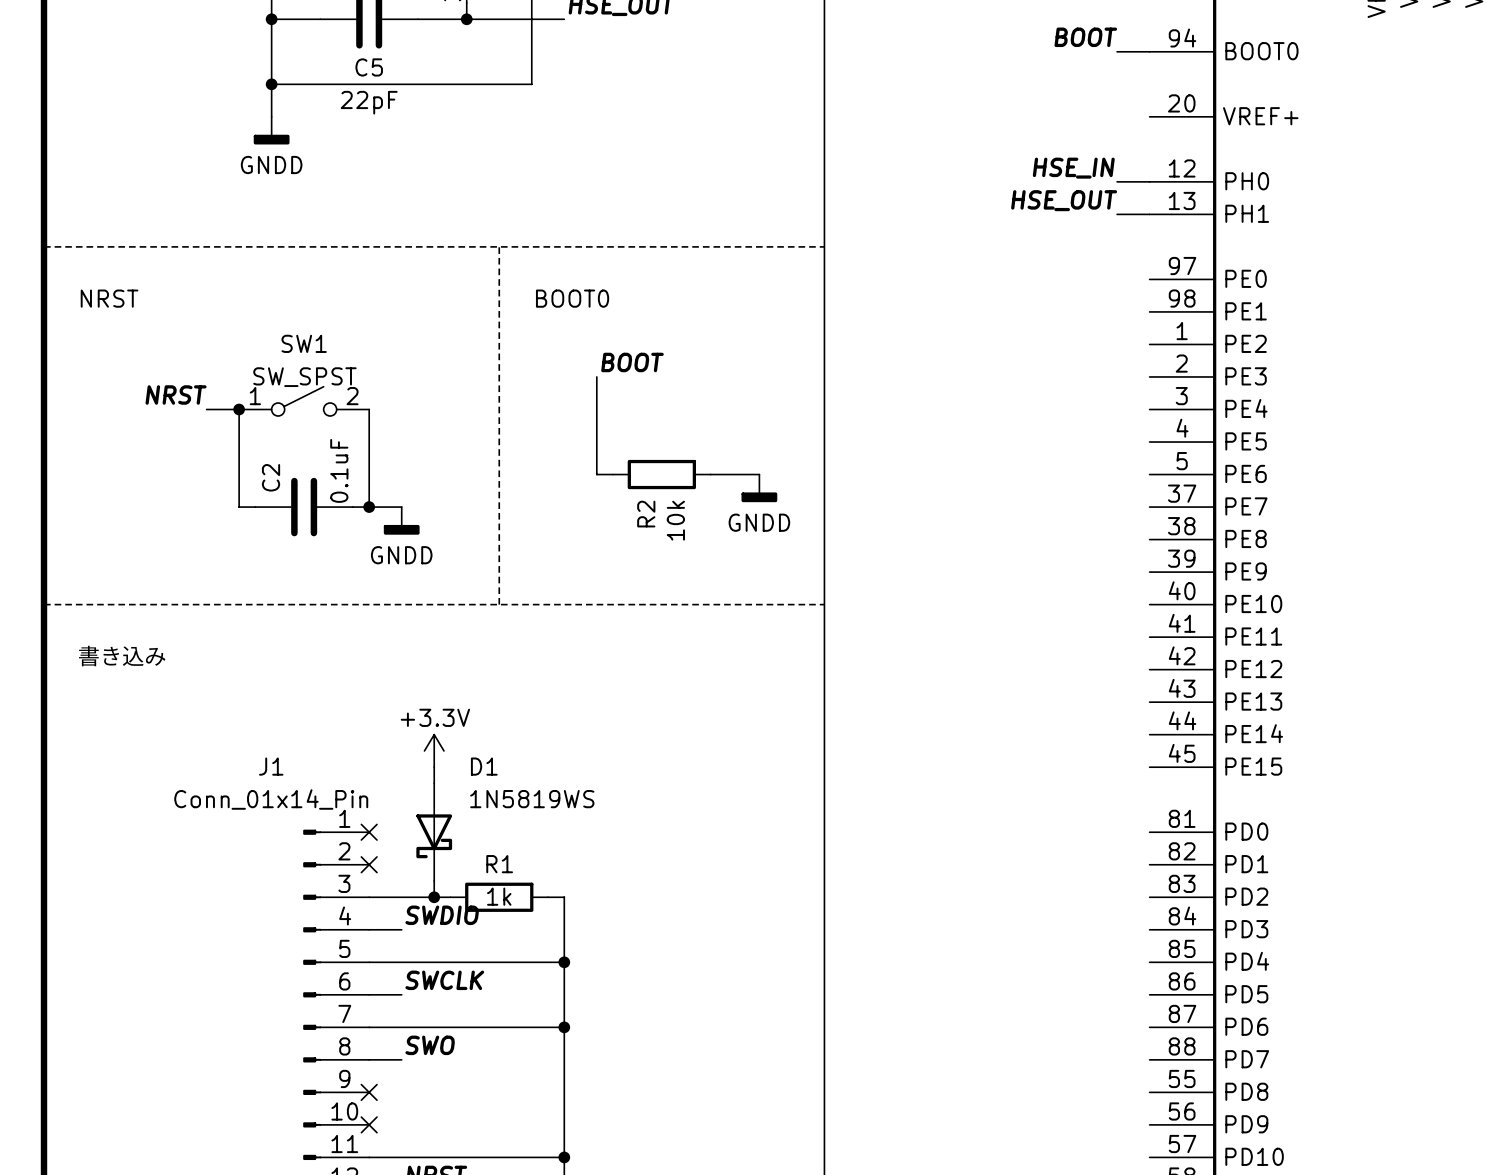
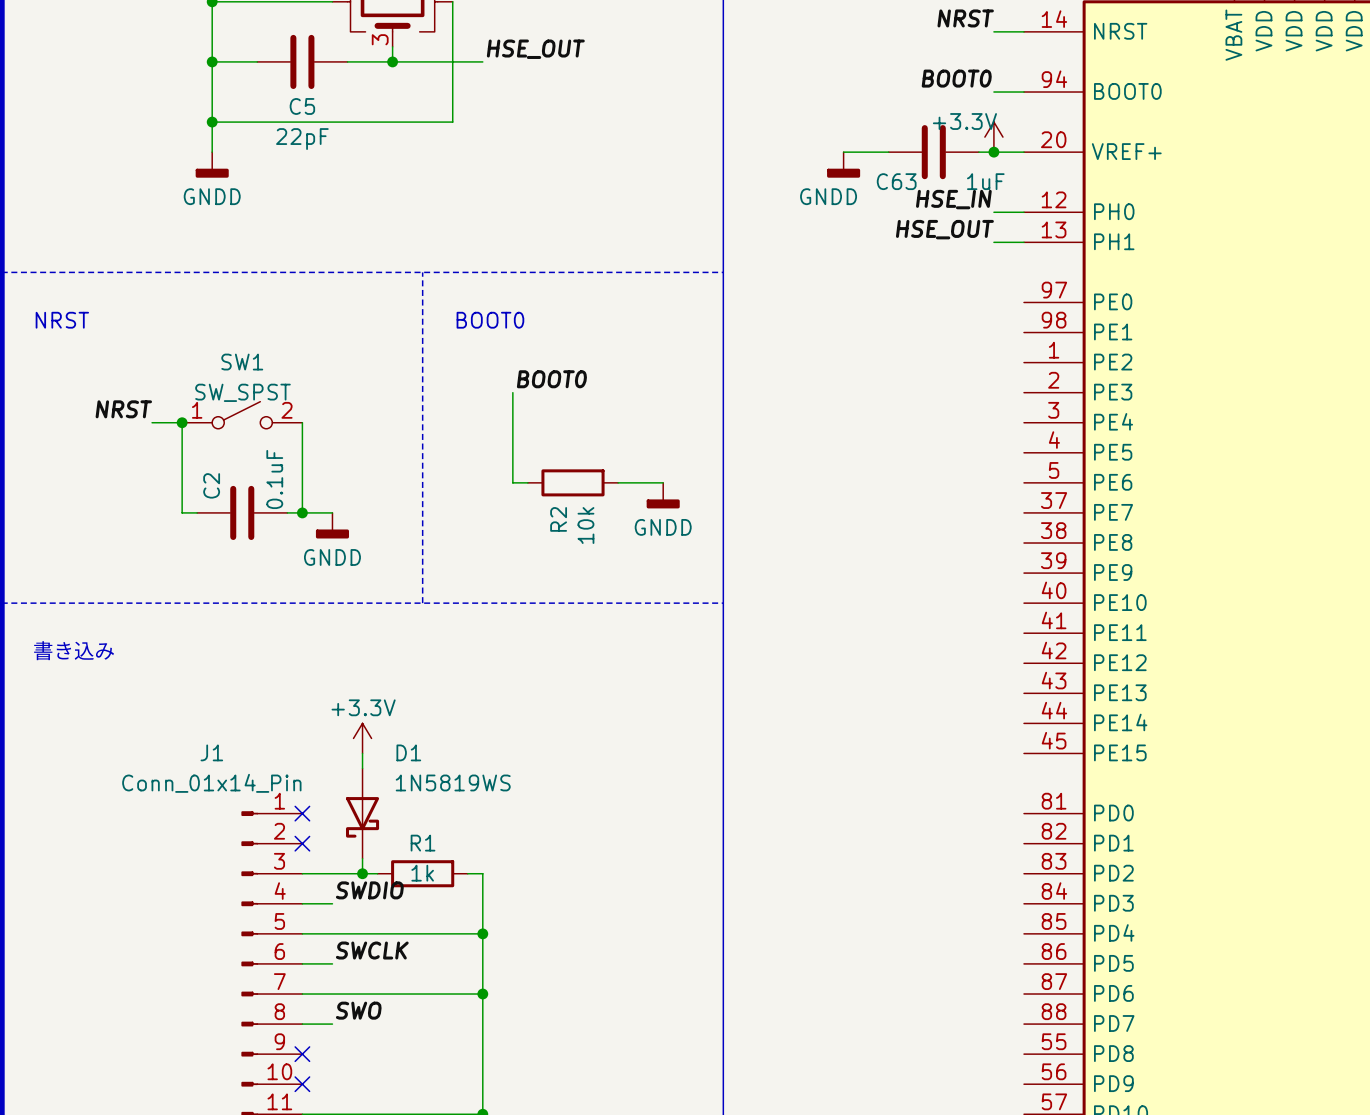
label: BOOT (1085, 37) -> BOOT0 (956, 78)
power symbol: none -> +3.3V (993, 137)
wire: none -> (843, 152) (888, 152)
C63: none -> 1uF (933, 152)
wire: none -> (978, 152) (1023, 152)
junction: none -> (993, 152)
power symbol: none -> GNDD (843, 164)
label: BOOT (632, 362) -> BOOT0 (551, 379)

